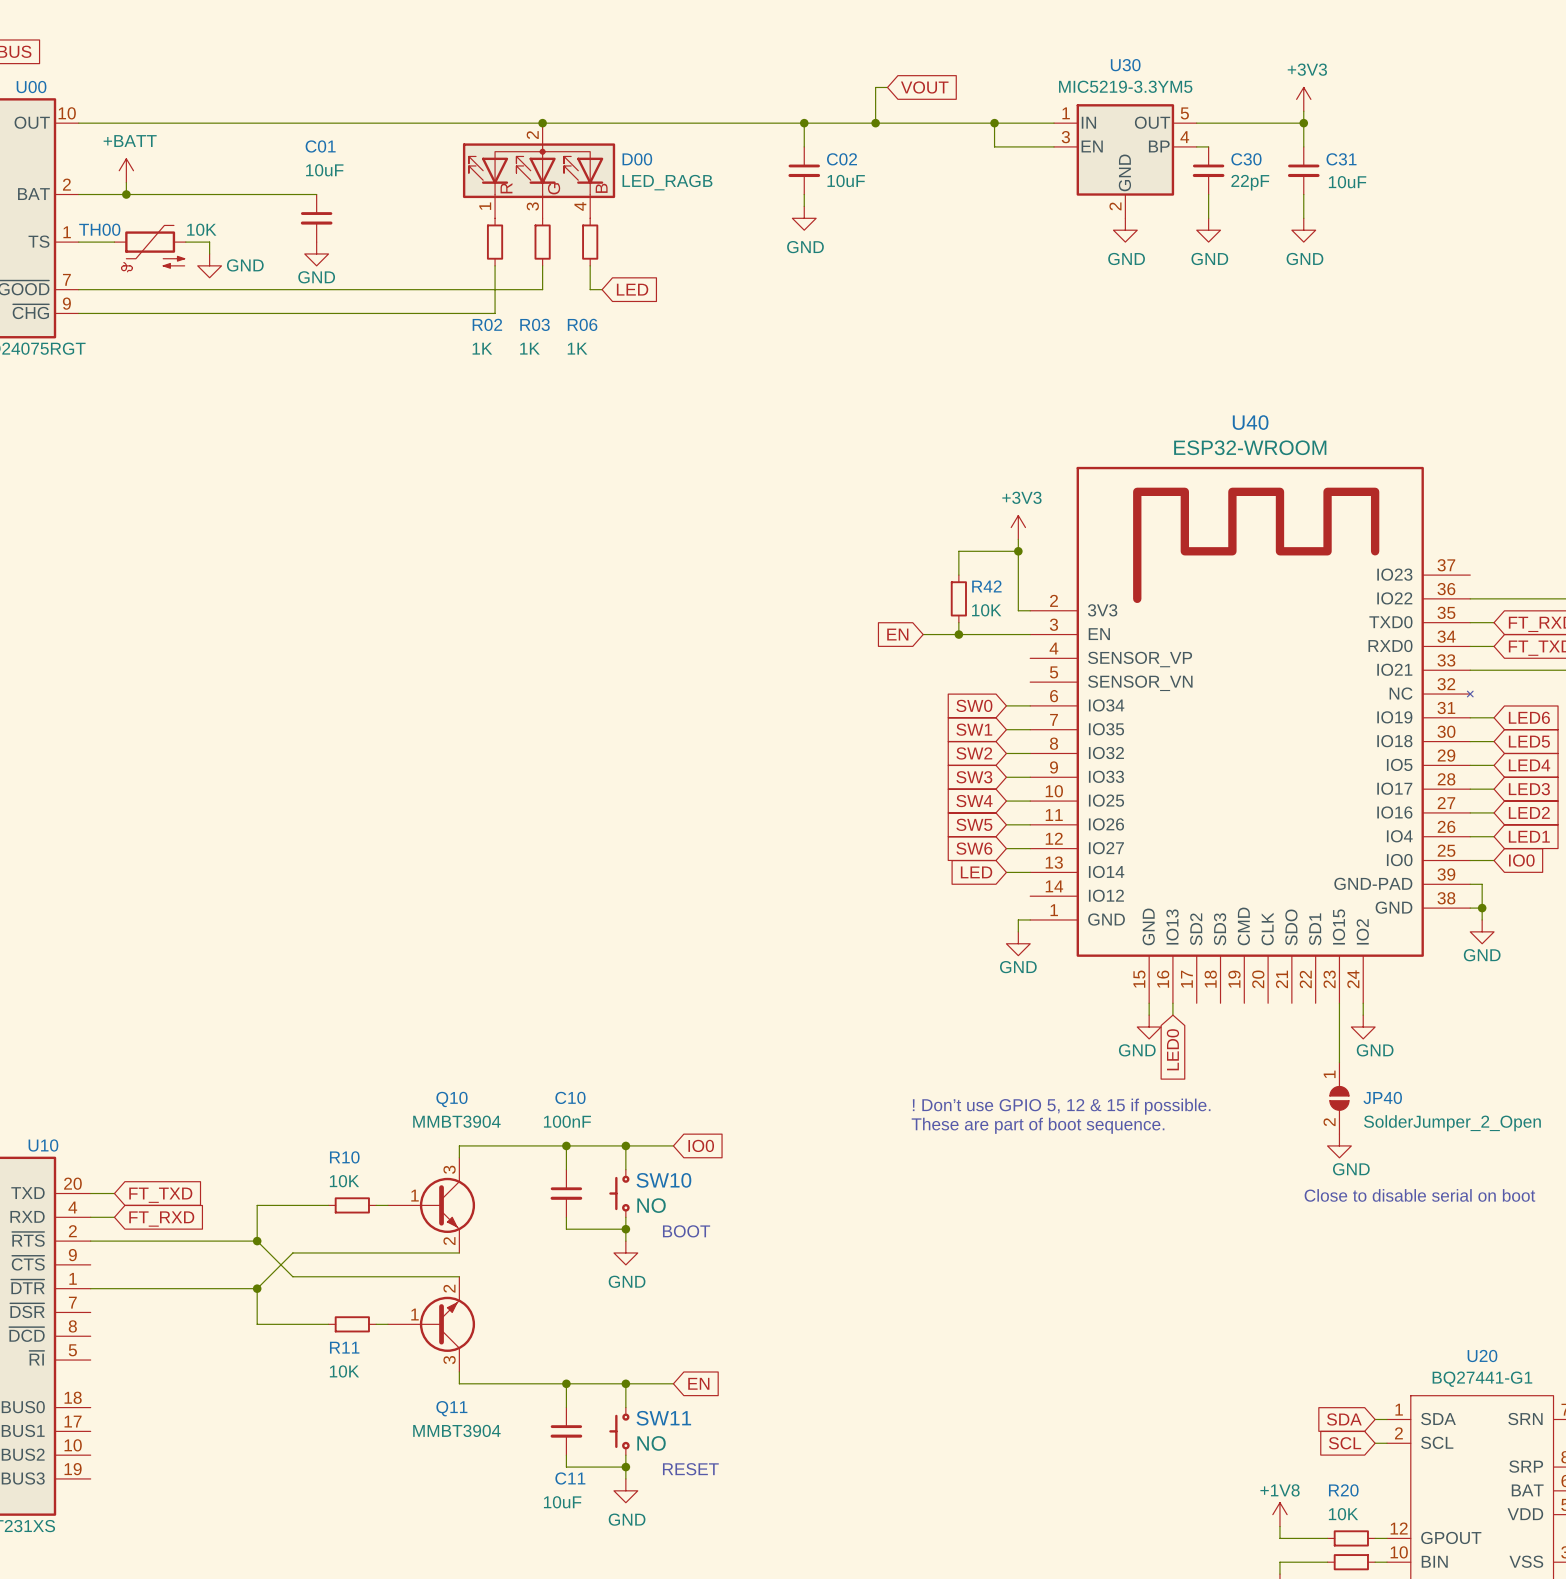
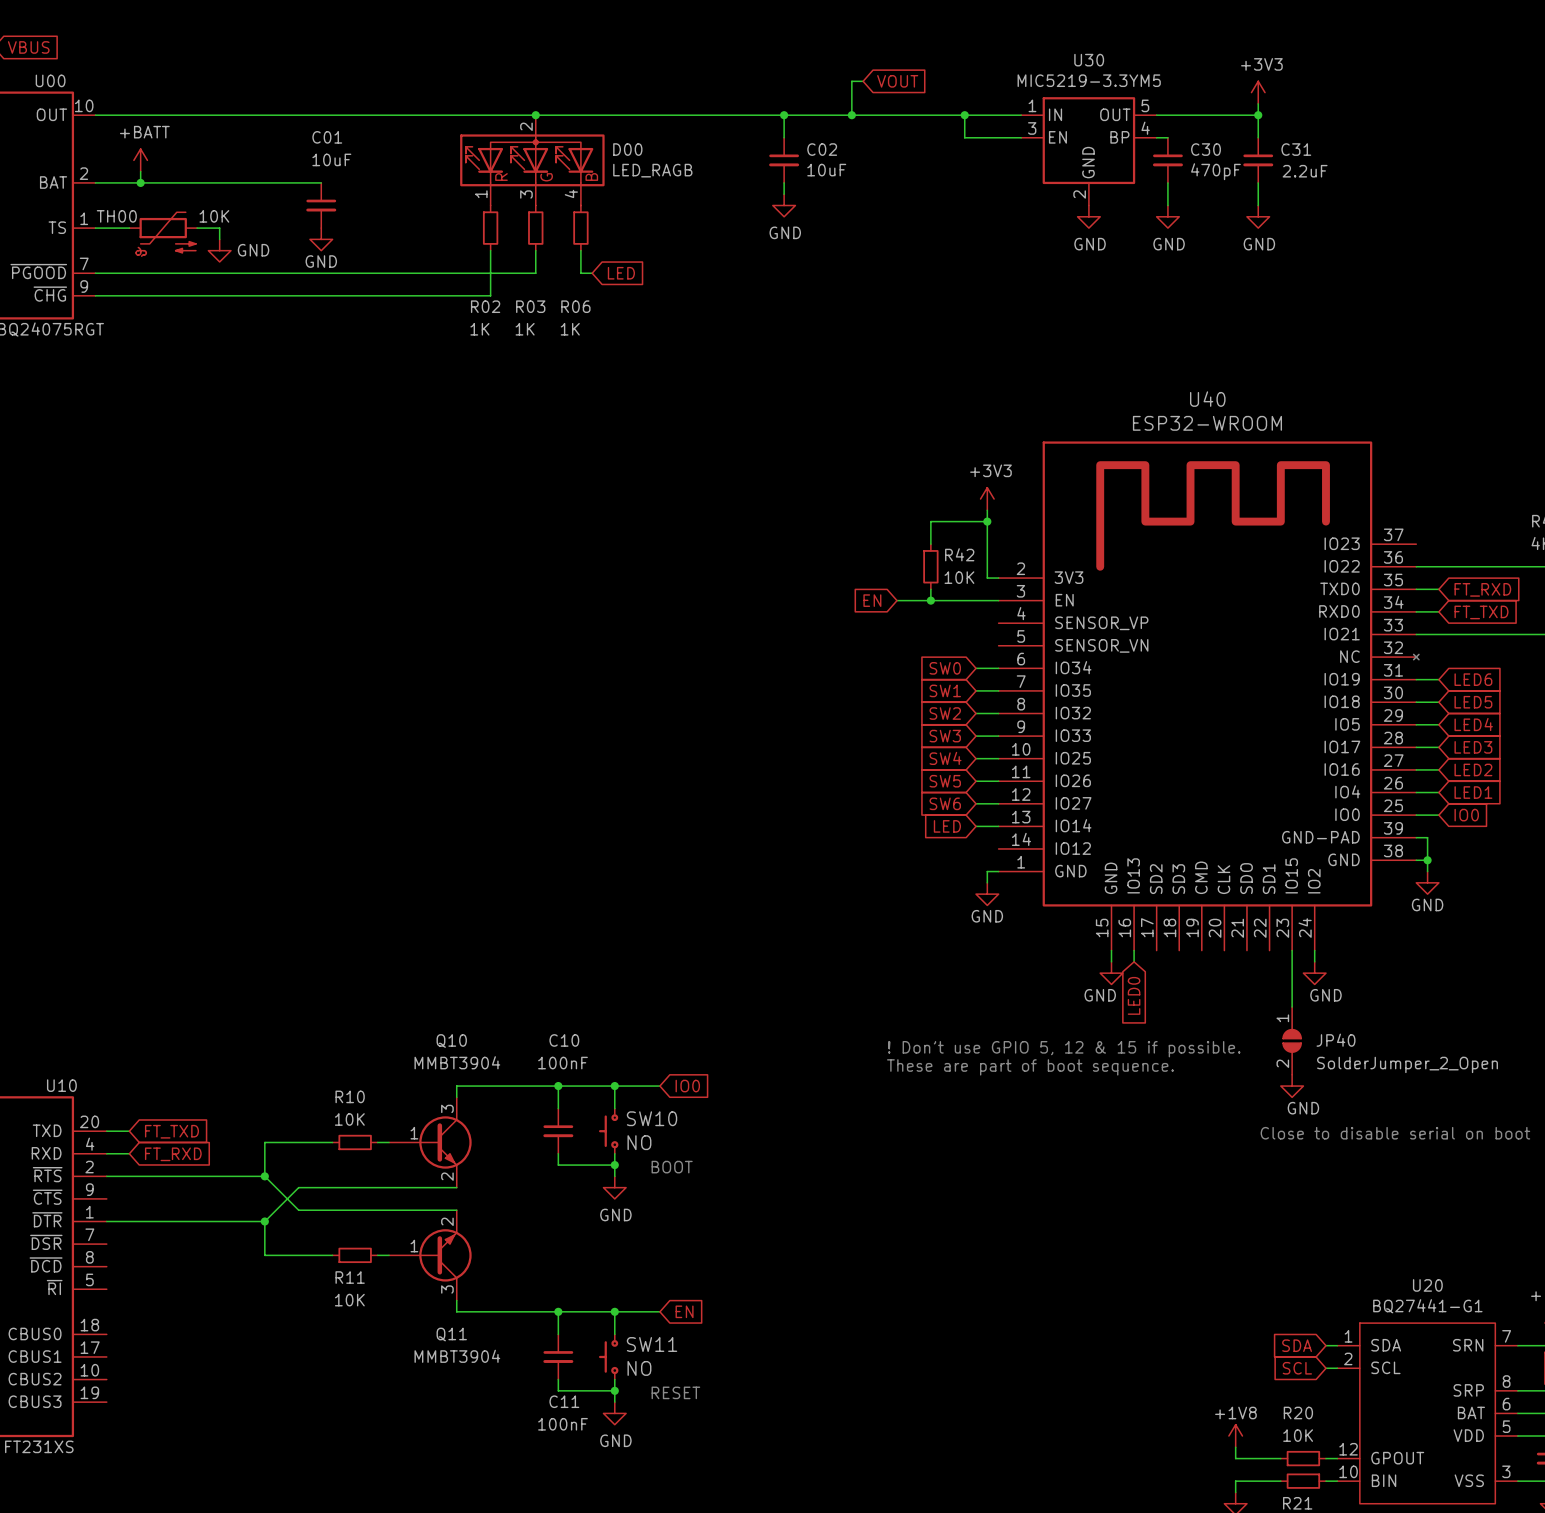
C30 value: 22pF (1250, 182) -> 470pF (1215, 171)
C31 value: 10uF (1347, 182) -> 2.2uF (1305, 171)
C11 value: 10uF (562, 1502) -> 100nF (562, 1424)

